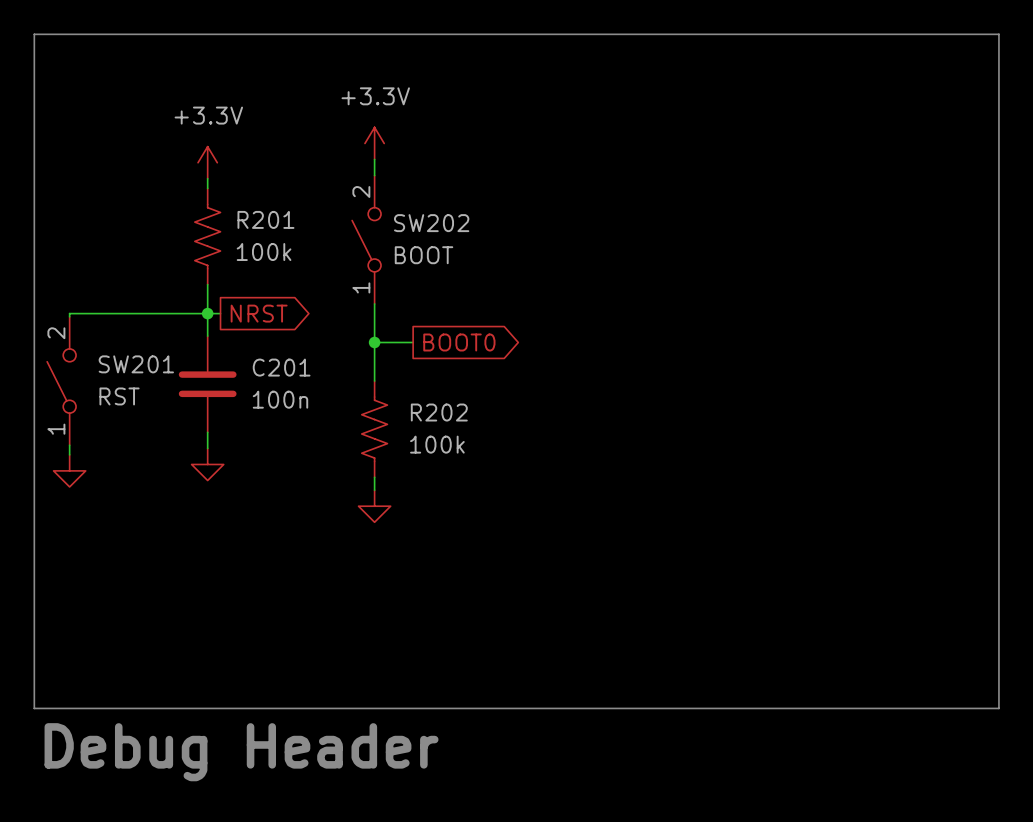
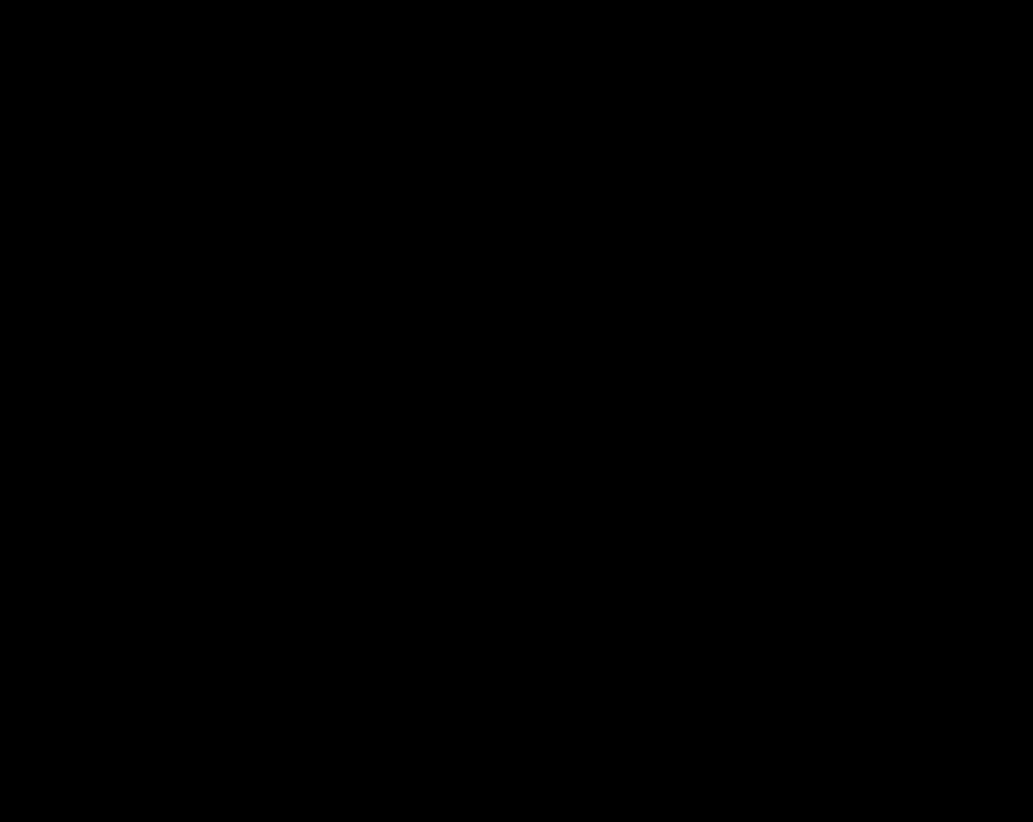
line: (34, 34) (998, 34) (998, 708) (34, 708) (34, 34) -> none
power symbol: +3.3V (374, 143) -> none
wire: (374, 159) (374, 175) -> none
power symbol: +3.3V (207, 162) -> none
wire: (207, 178) (207, 188) -> none
R201: 100k (207, 236) -> none
SW202: BOOT (366, 239) -> none
wire: (207, 284) (207, 336) -> none
wire: (374, 303) (374, 381) -> none
junction: (207, 313) -> none
wire: (220, 313) (69, 313) (69, 316) -> none
global label: NRST (259, 313) -> none
wire: (374, 342) (413, 342) -> none
junction: (374, 342) -> none
global label: BOOT0 (459, 342) -> none
SW201: RST (61, 381) -> none
C201: 100n (207, 384) -> none
R202: 100k (374, 429) -> none
wire: (207, 432) (207, 448) -> none
wire: (69, 445) (69, 454) -> none
power symbol: (207, 464) -> none
power symbol: (69, 470) -> none
wire: (374, 477) (374, 490) -> none
power symbol: (374, 506) -> none
text: Debug Header (241, 752) -> none

